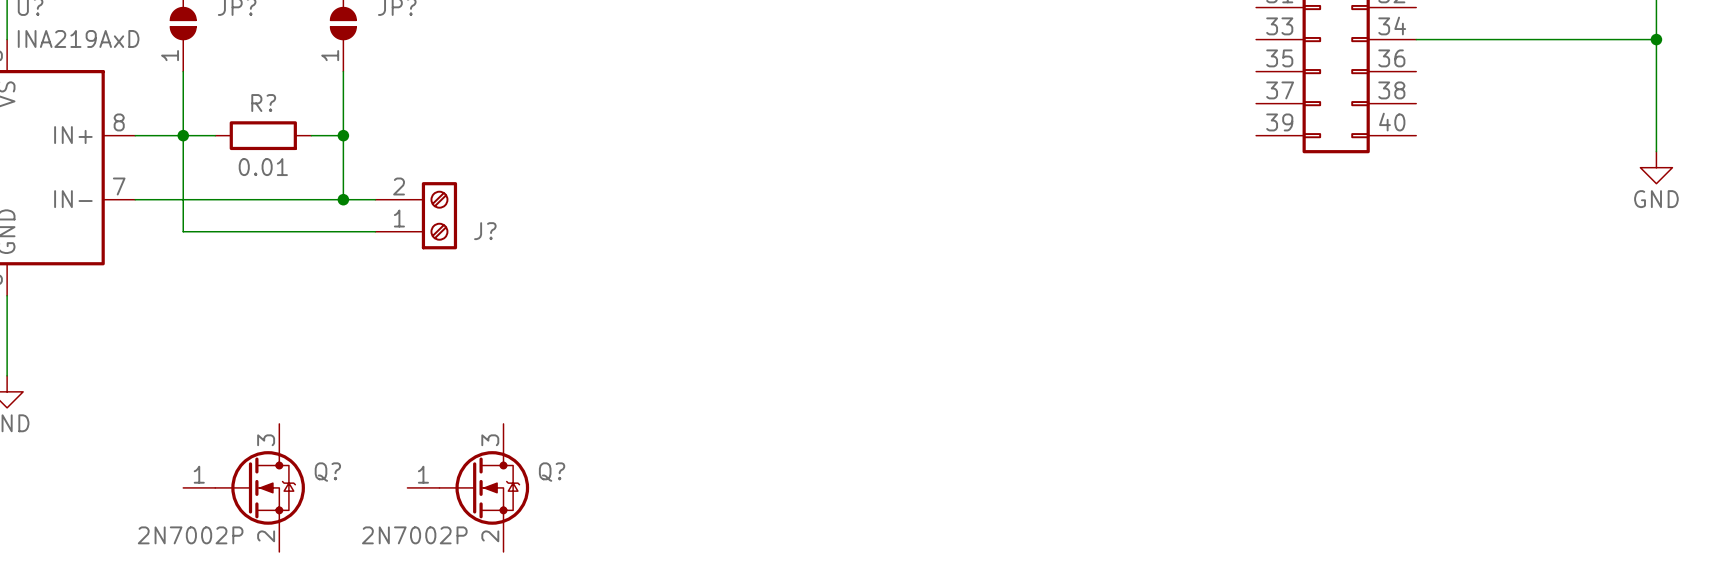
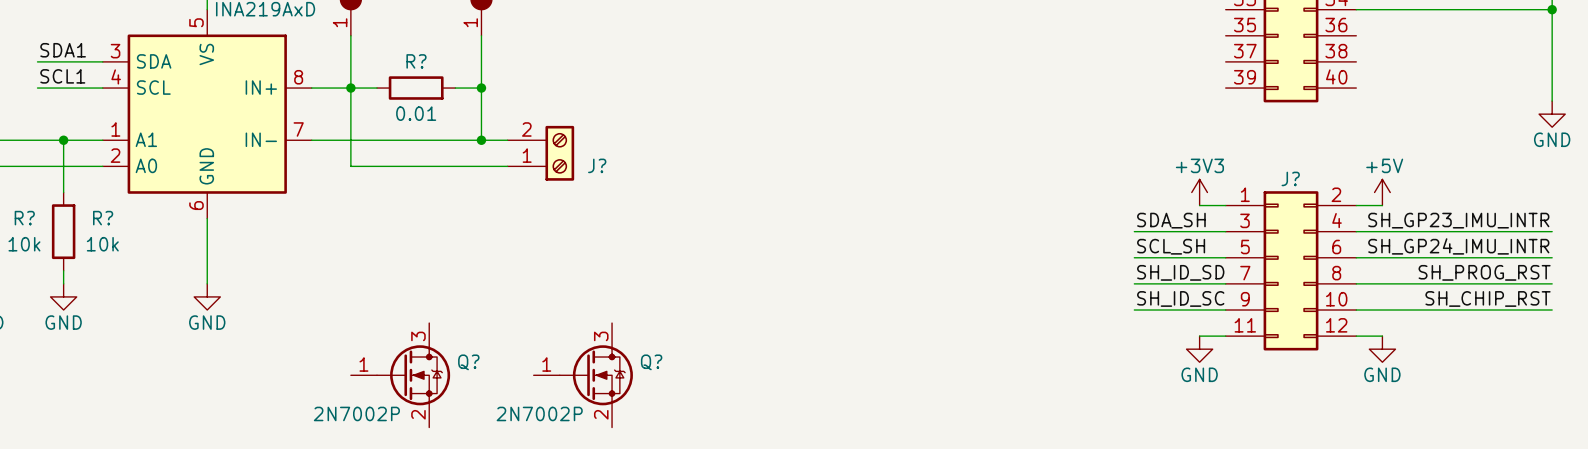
power symbol: none -> +3V3 (1199, 192)
power symbol: none -> +5V (1382, 192)
wire: none -> (1199, 205) (1225, 205)
wire: none -> (1356, 205) (1382, 205)
label: none -> SDA_SH (1171, 220)
label: none -> SH_GP23_IMU_INTR (1458, 220)
wire: none -> (1134, 231) (1225, 231)
wire: none -> (1356, 231) (1552, 231)
label: none -> SH_GP24_IMU_INTR (1458, 246)
label: none -> SCL_SH (1171, 246)
wire: none -> (1134, 257) (1225, 257)
wire: none -> (1356, 257) (1552, 257)
J?: none -> (1291, 270)
label: none -> SH_ID_SD (1180, 272)
label: none -> SH_PROG_RST (1484, 272)
wire: none -> (1134, 283) (1225, 283)
wire: none -> (1356, 283) (1552, 283)
label: none -> SH_ID_SC (1180, 298)
label: none -> SH_CHIP_RST (1488, 298)
wire: none -> (1134, 310) (1225, 310)
wire: none -> (1356, 310) (1552, 310)
wire: none -> (1199, 336) (1225, 336)
wire: none -> (1356, 336) (1382, 336)
power symbol: none -> GND (1199, 349)
power symbol: none -> GND (1382, 349)

